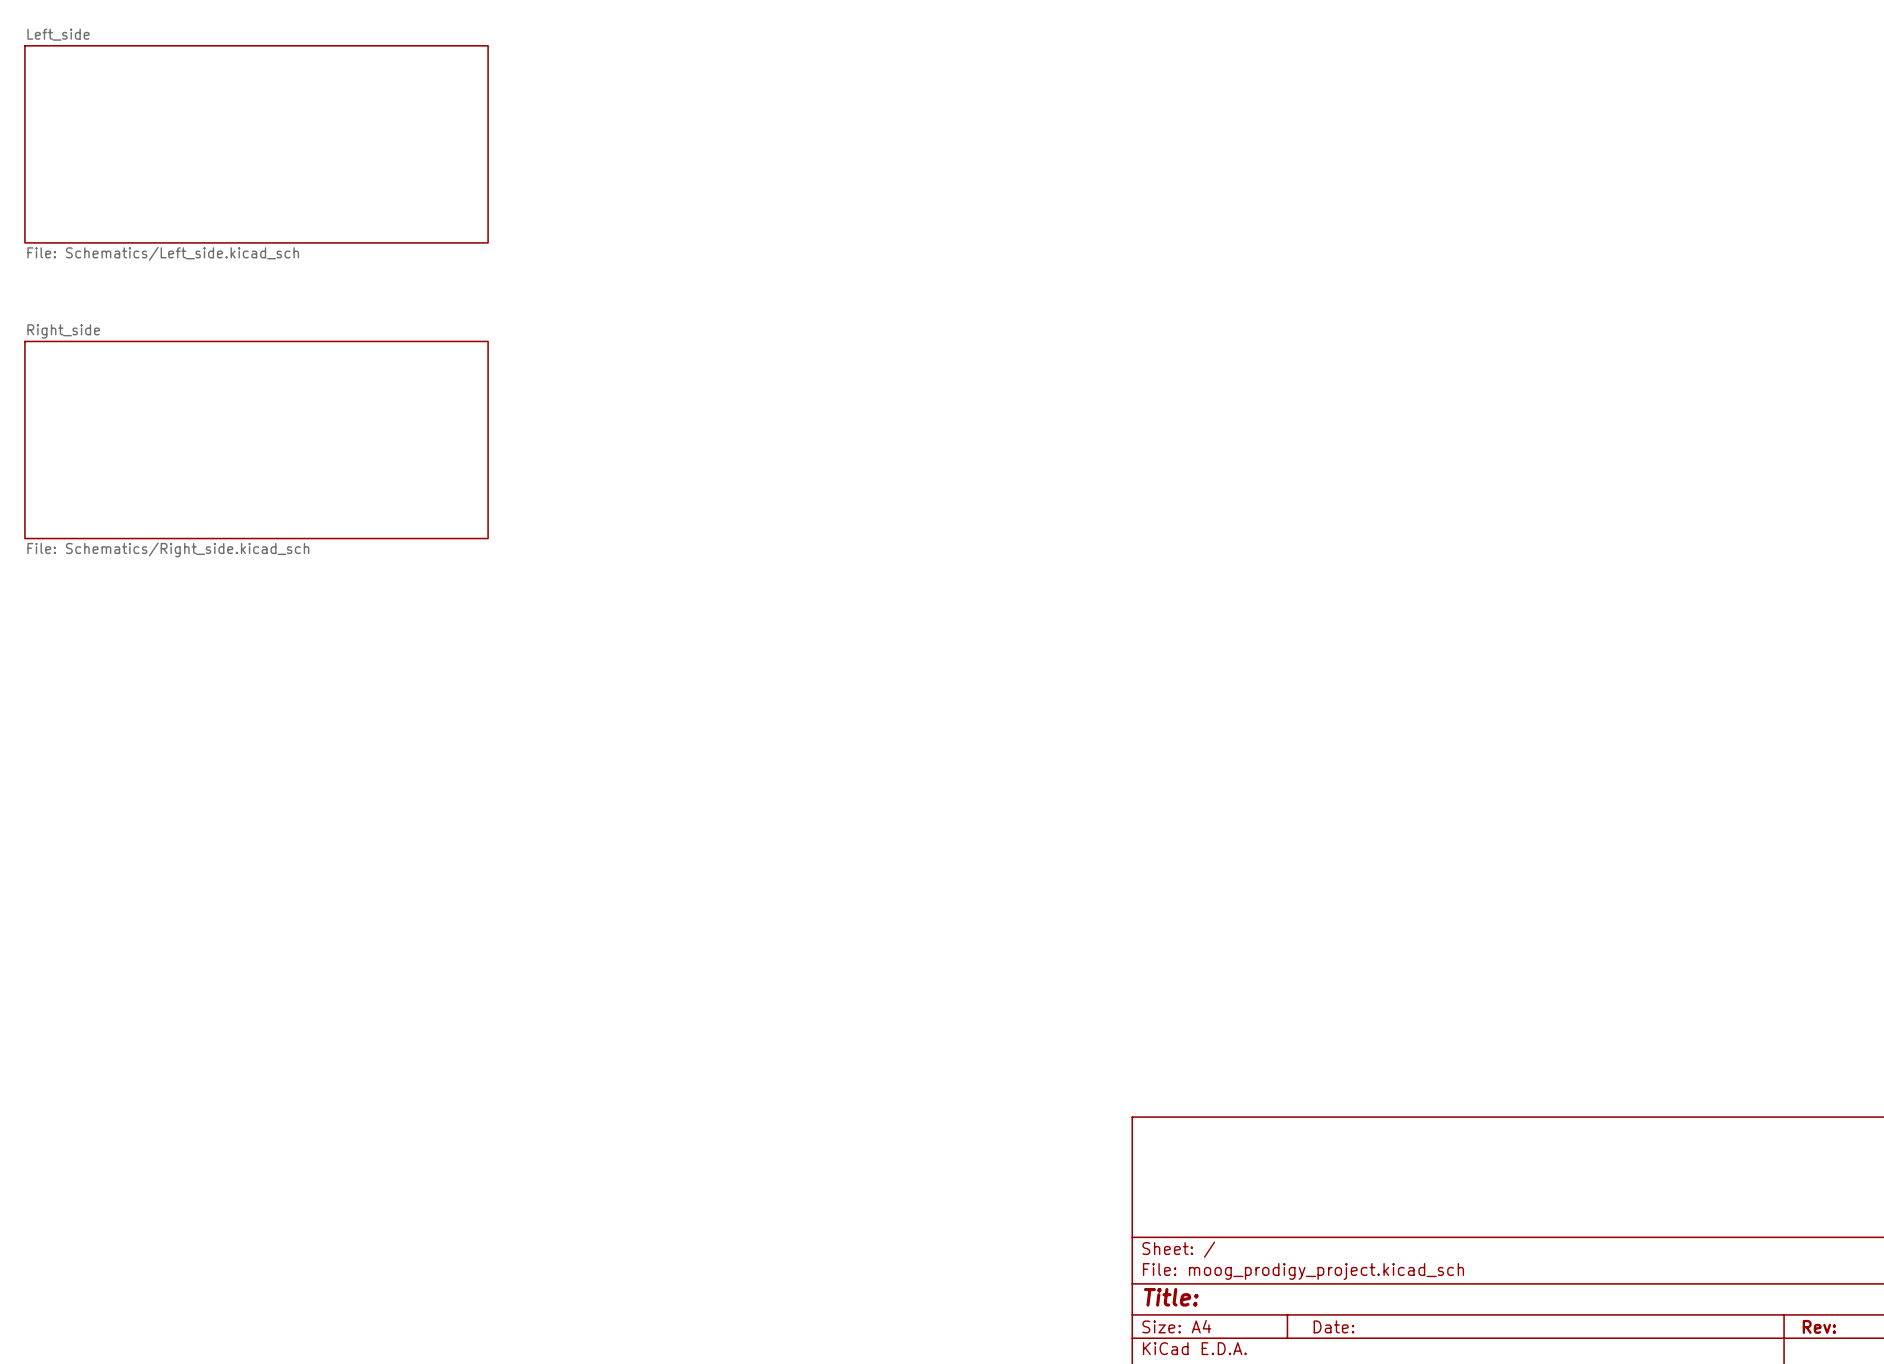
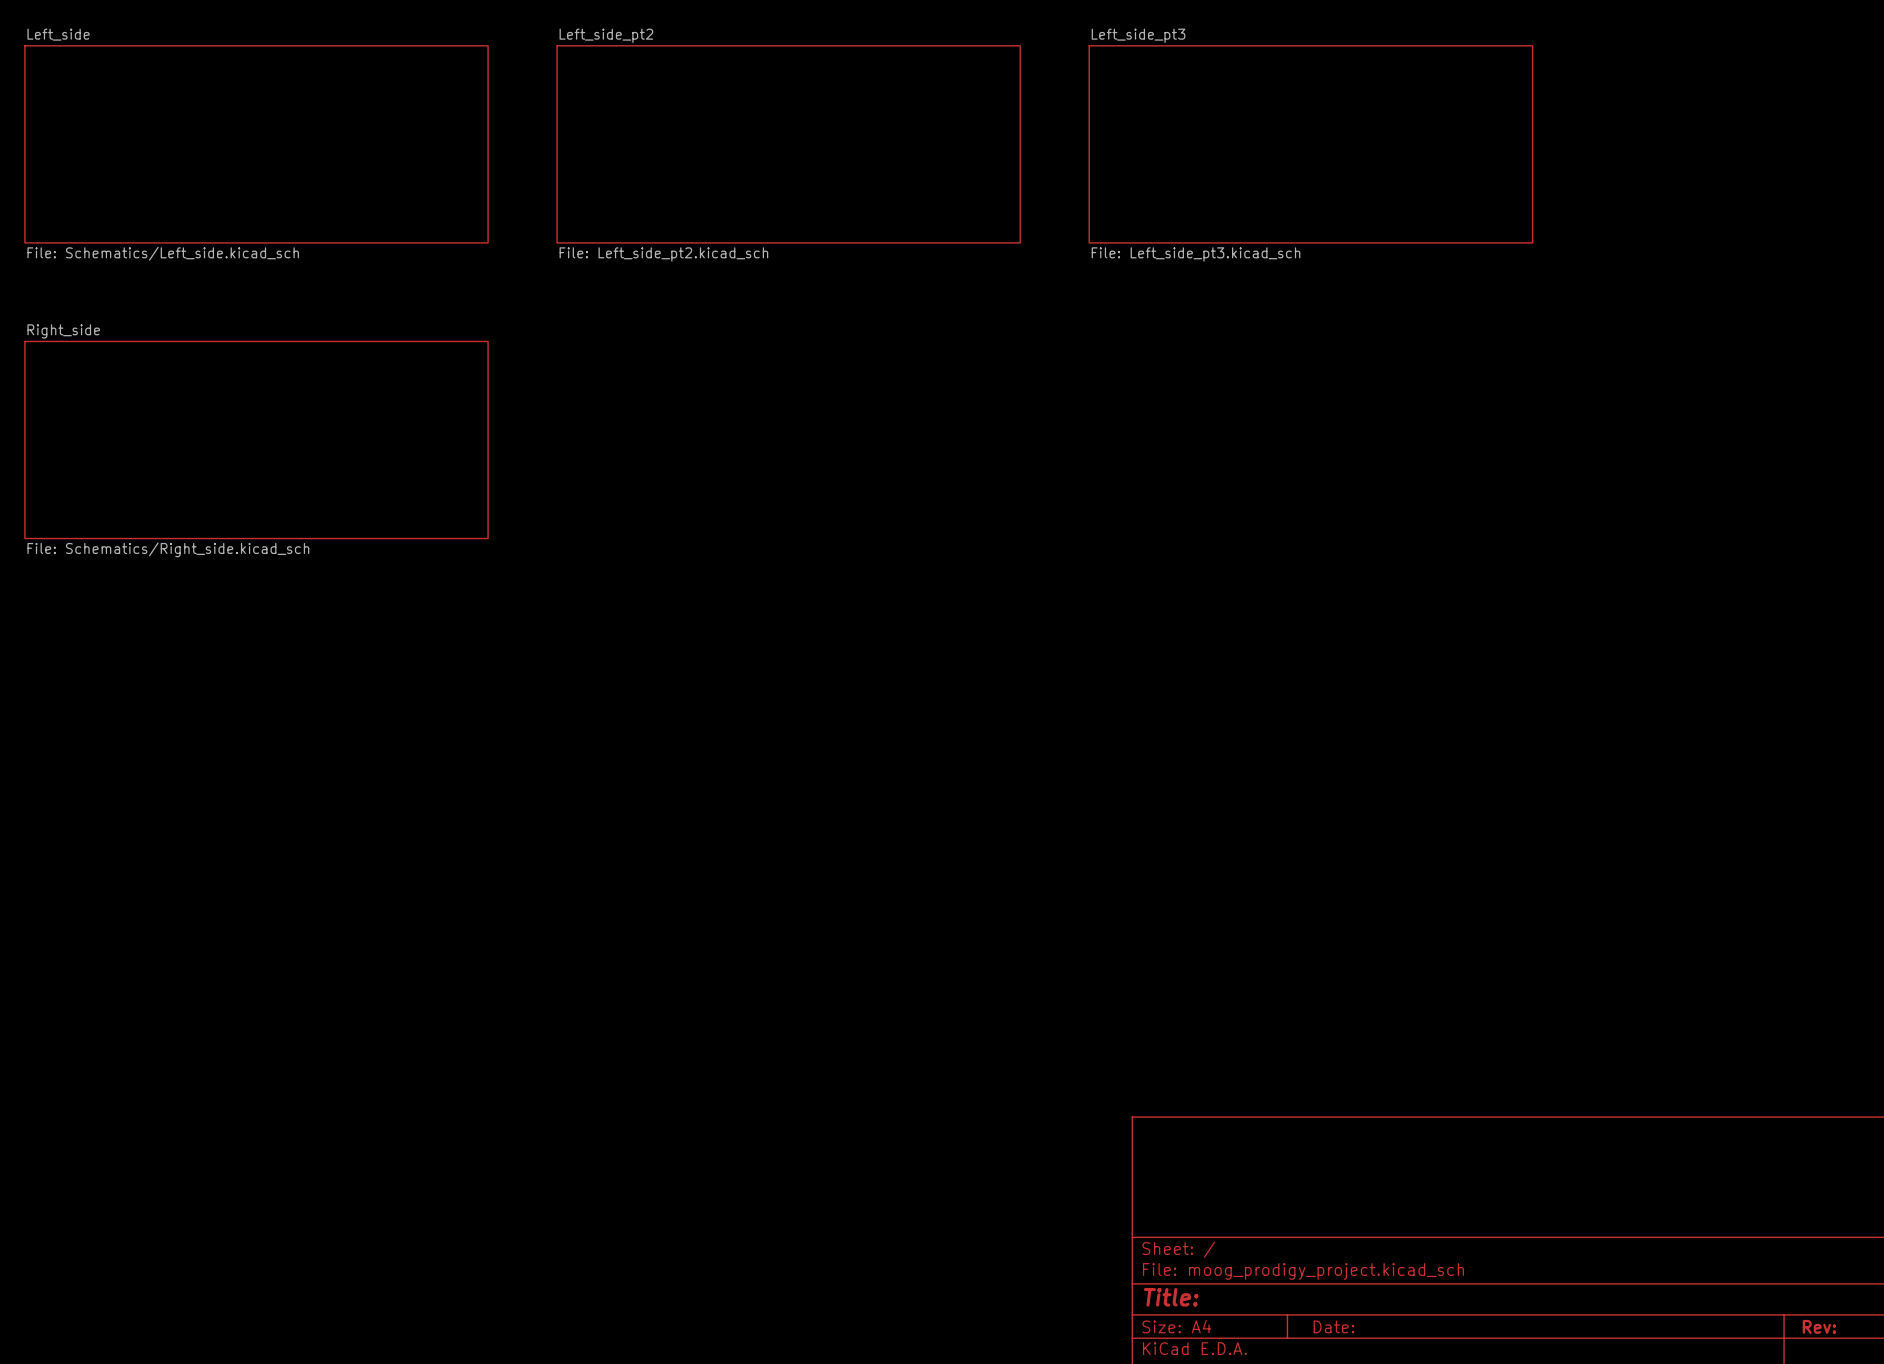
sheet Left_side_pt2: none -> File: Left_side_pt2.kicad_sch (788, 144)
sheet Left_side_pt3: none -> File: Left_side_pt3.kicad_sch (1310, 144)

